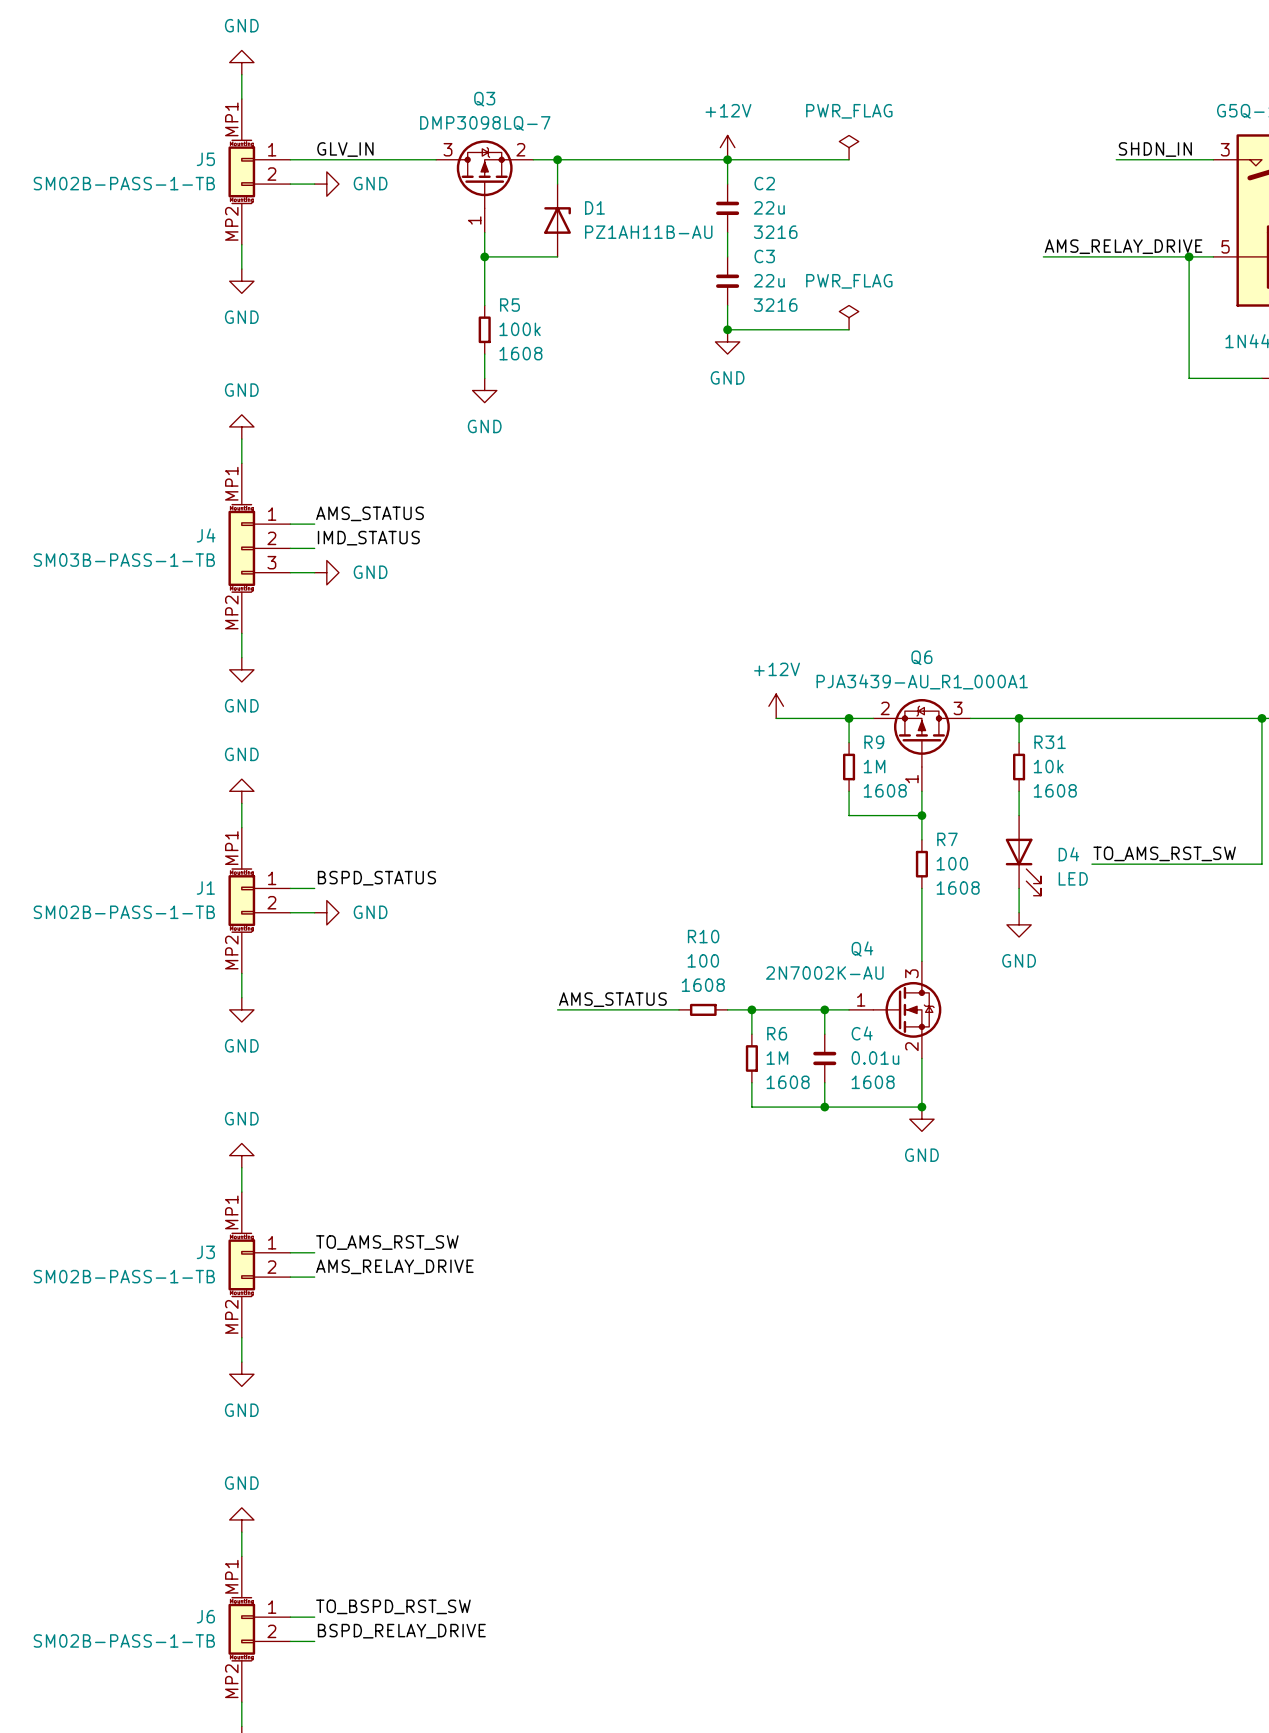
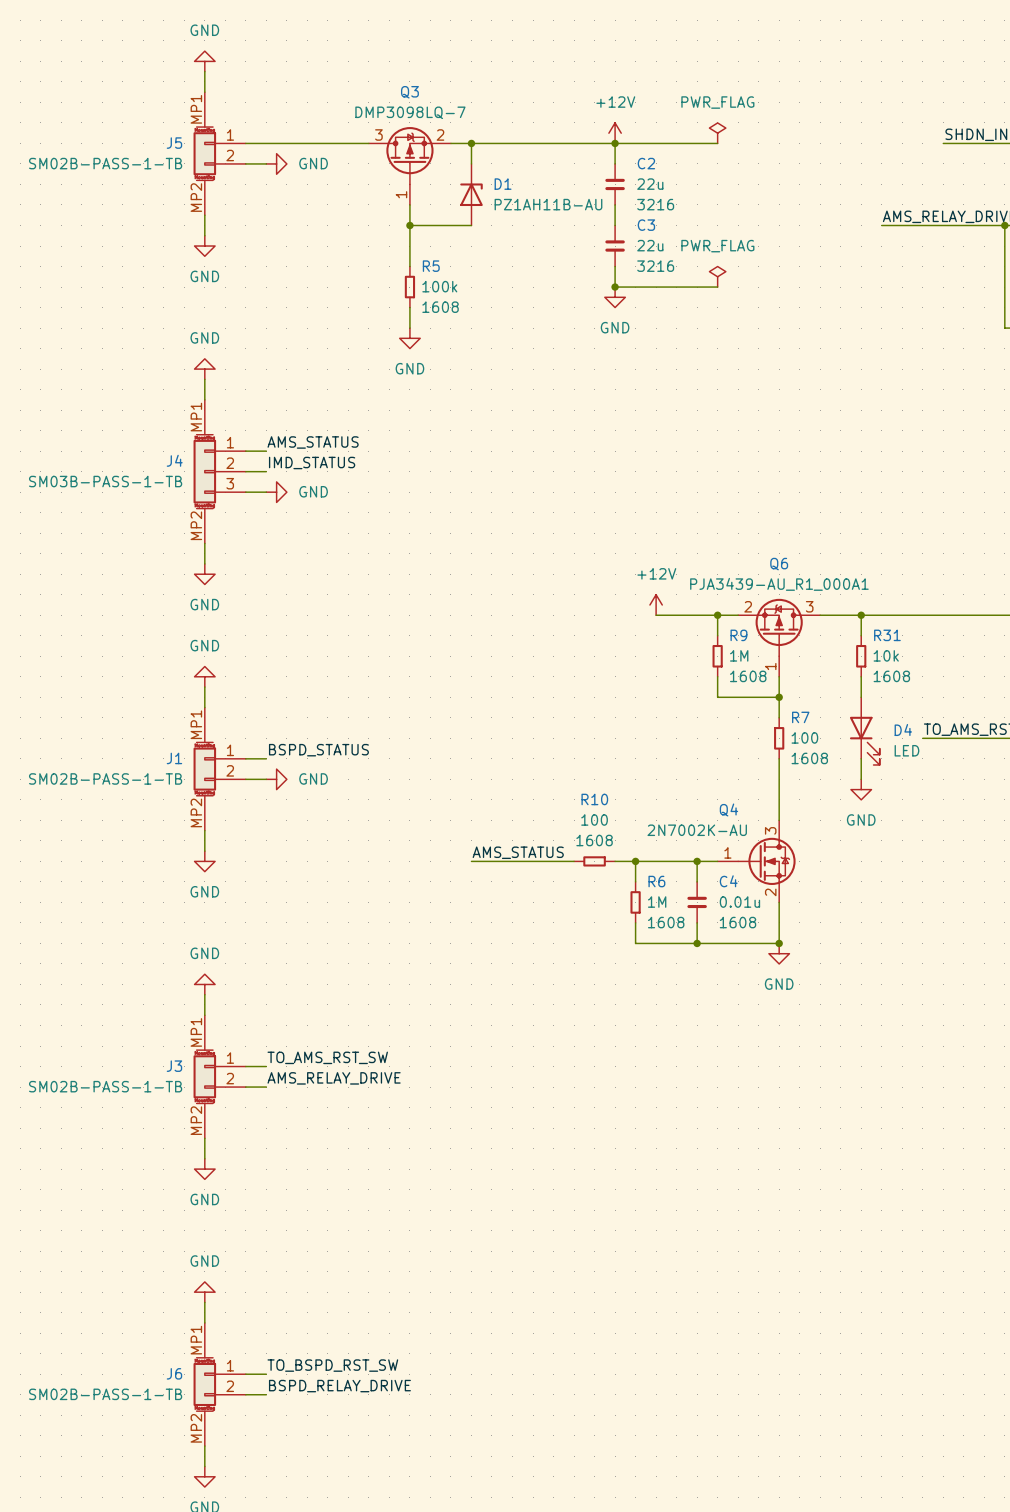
label: GLV_IN (345, 149) -> none

